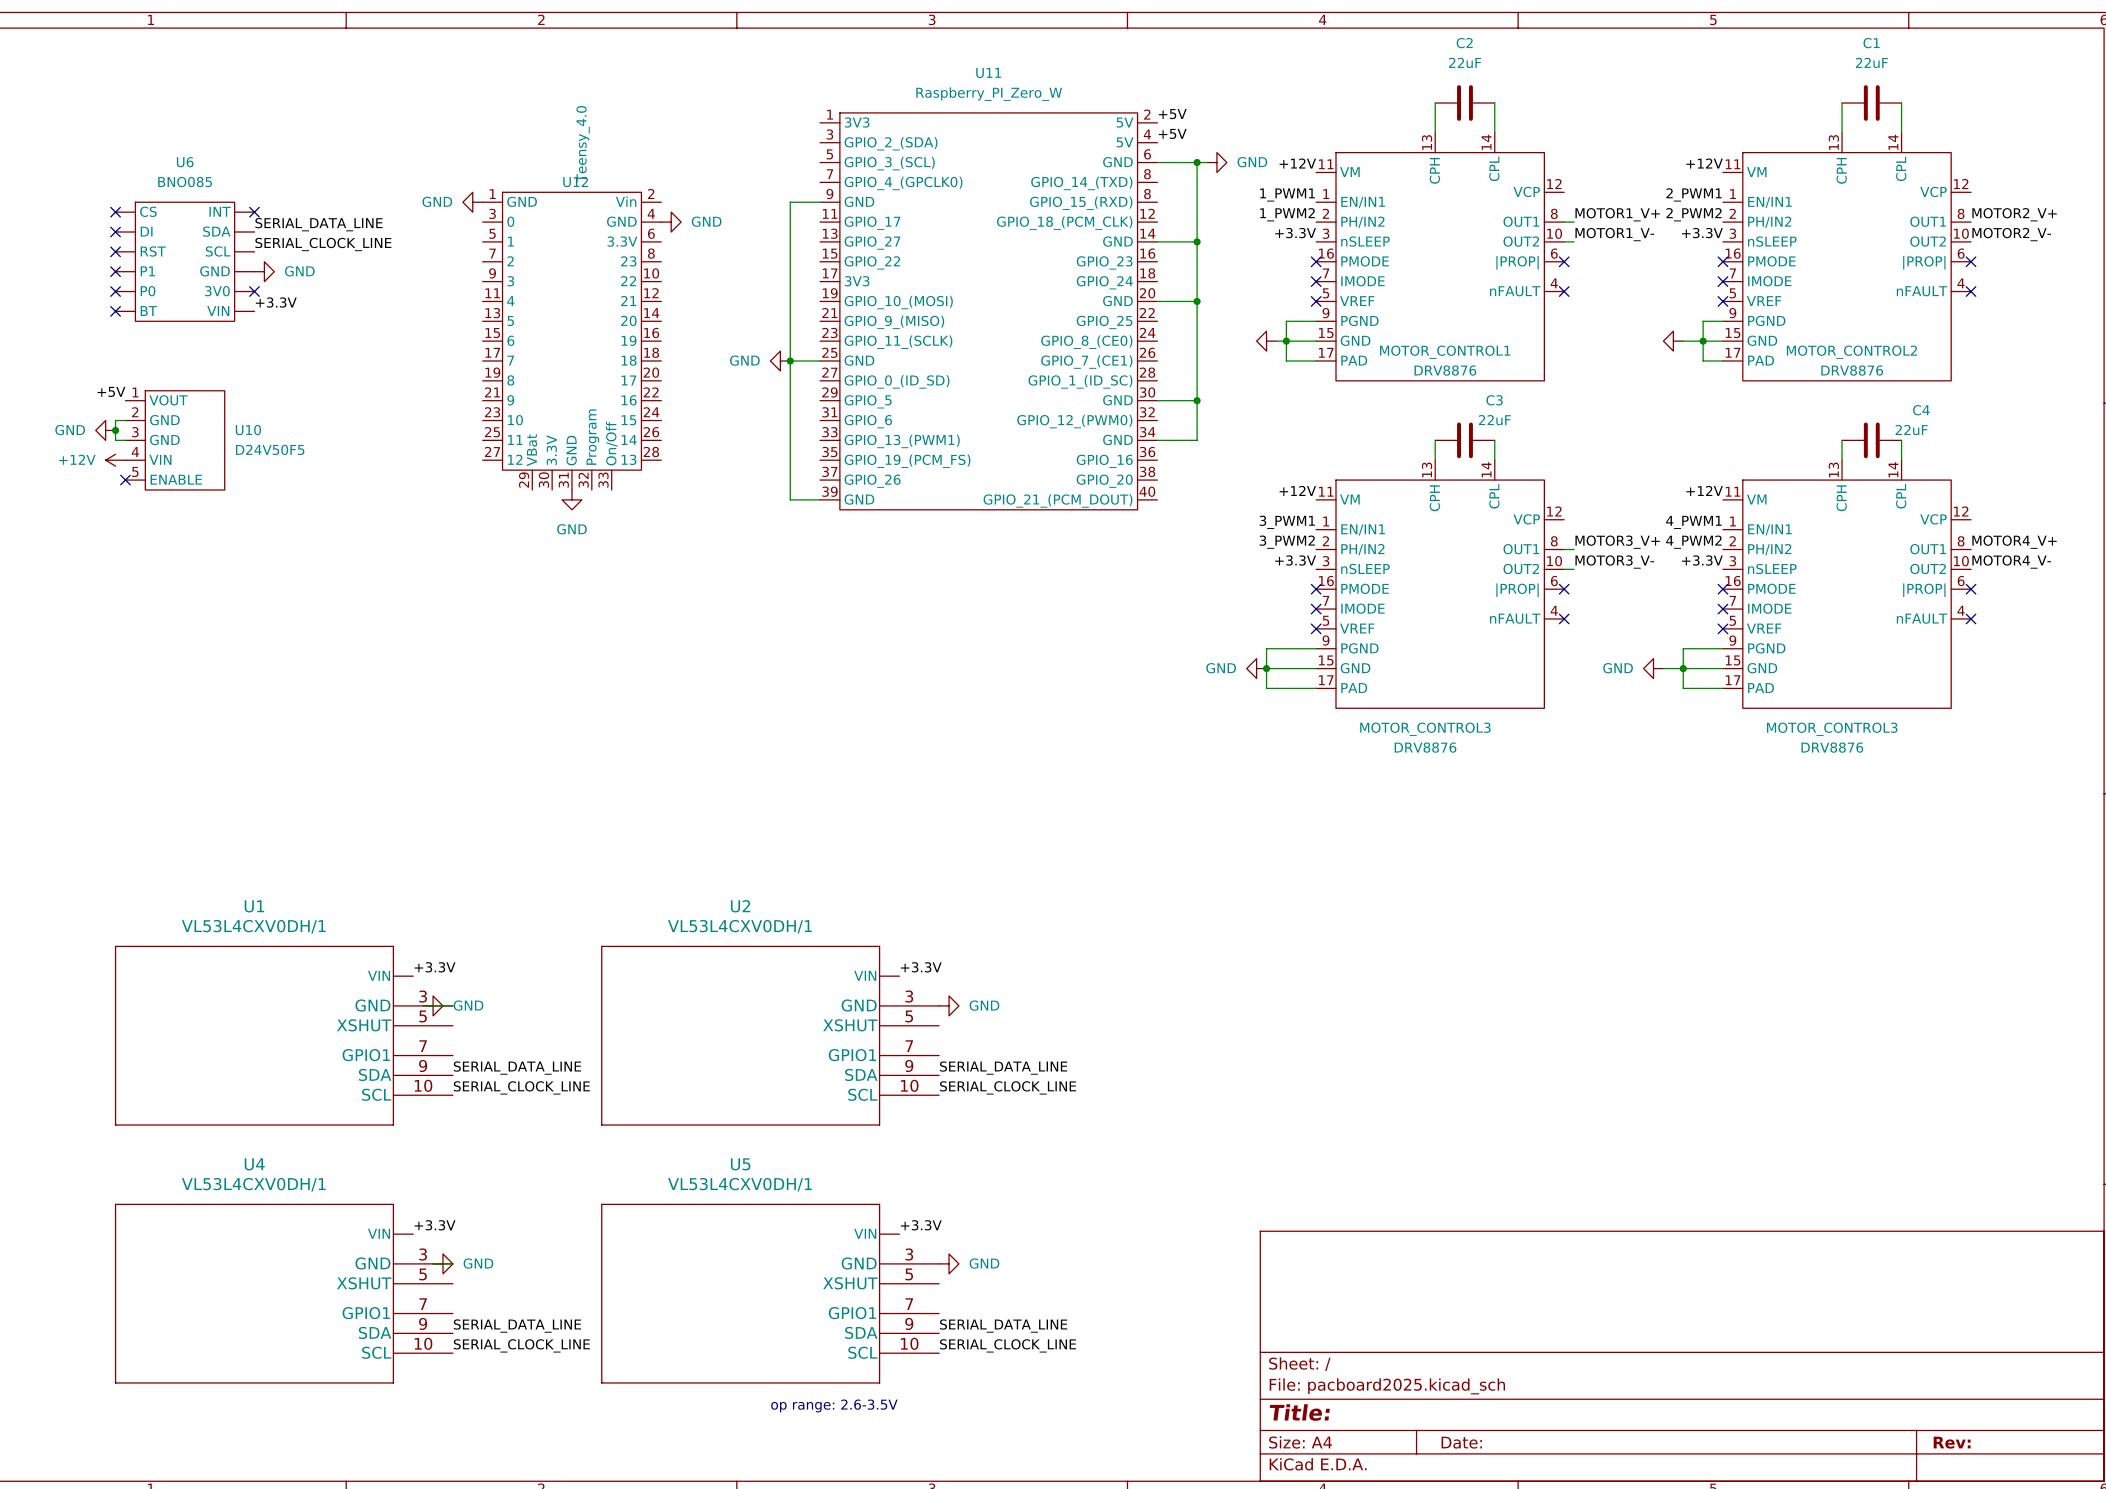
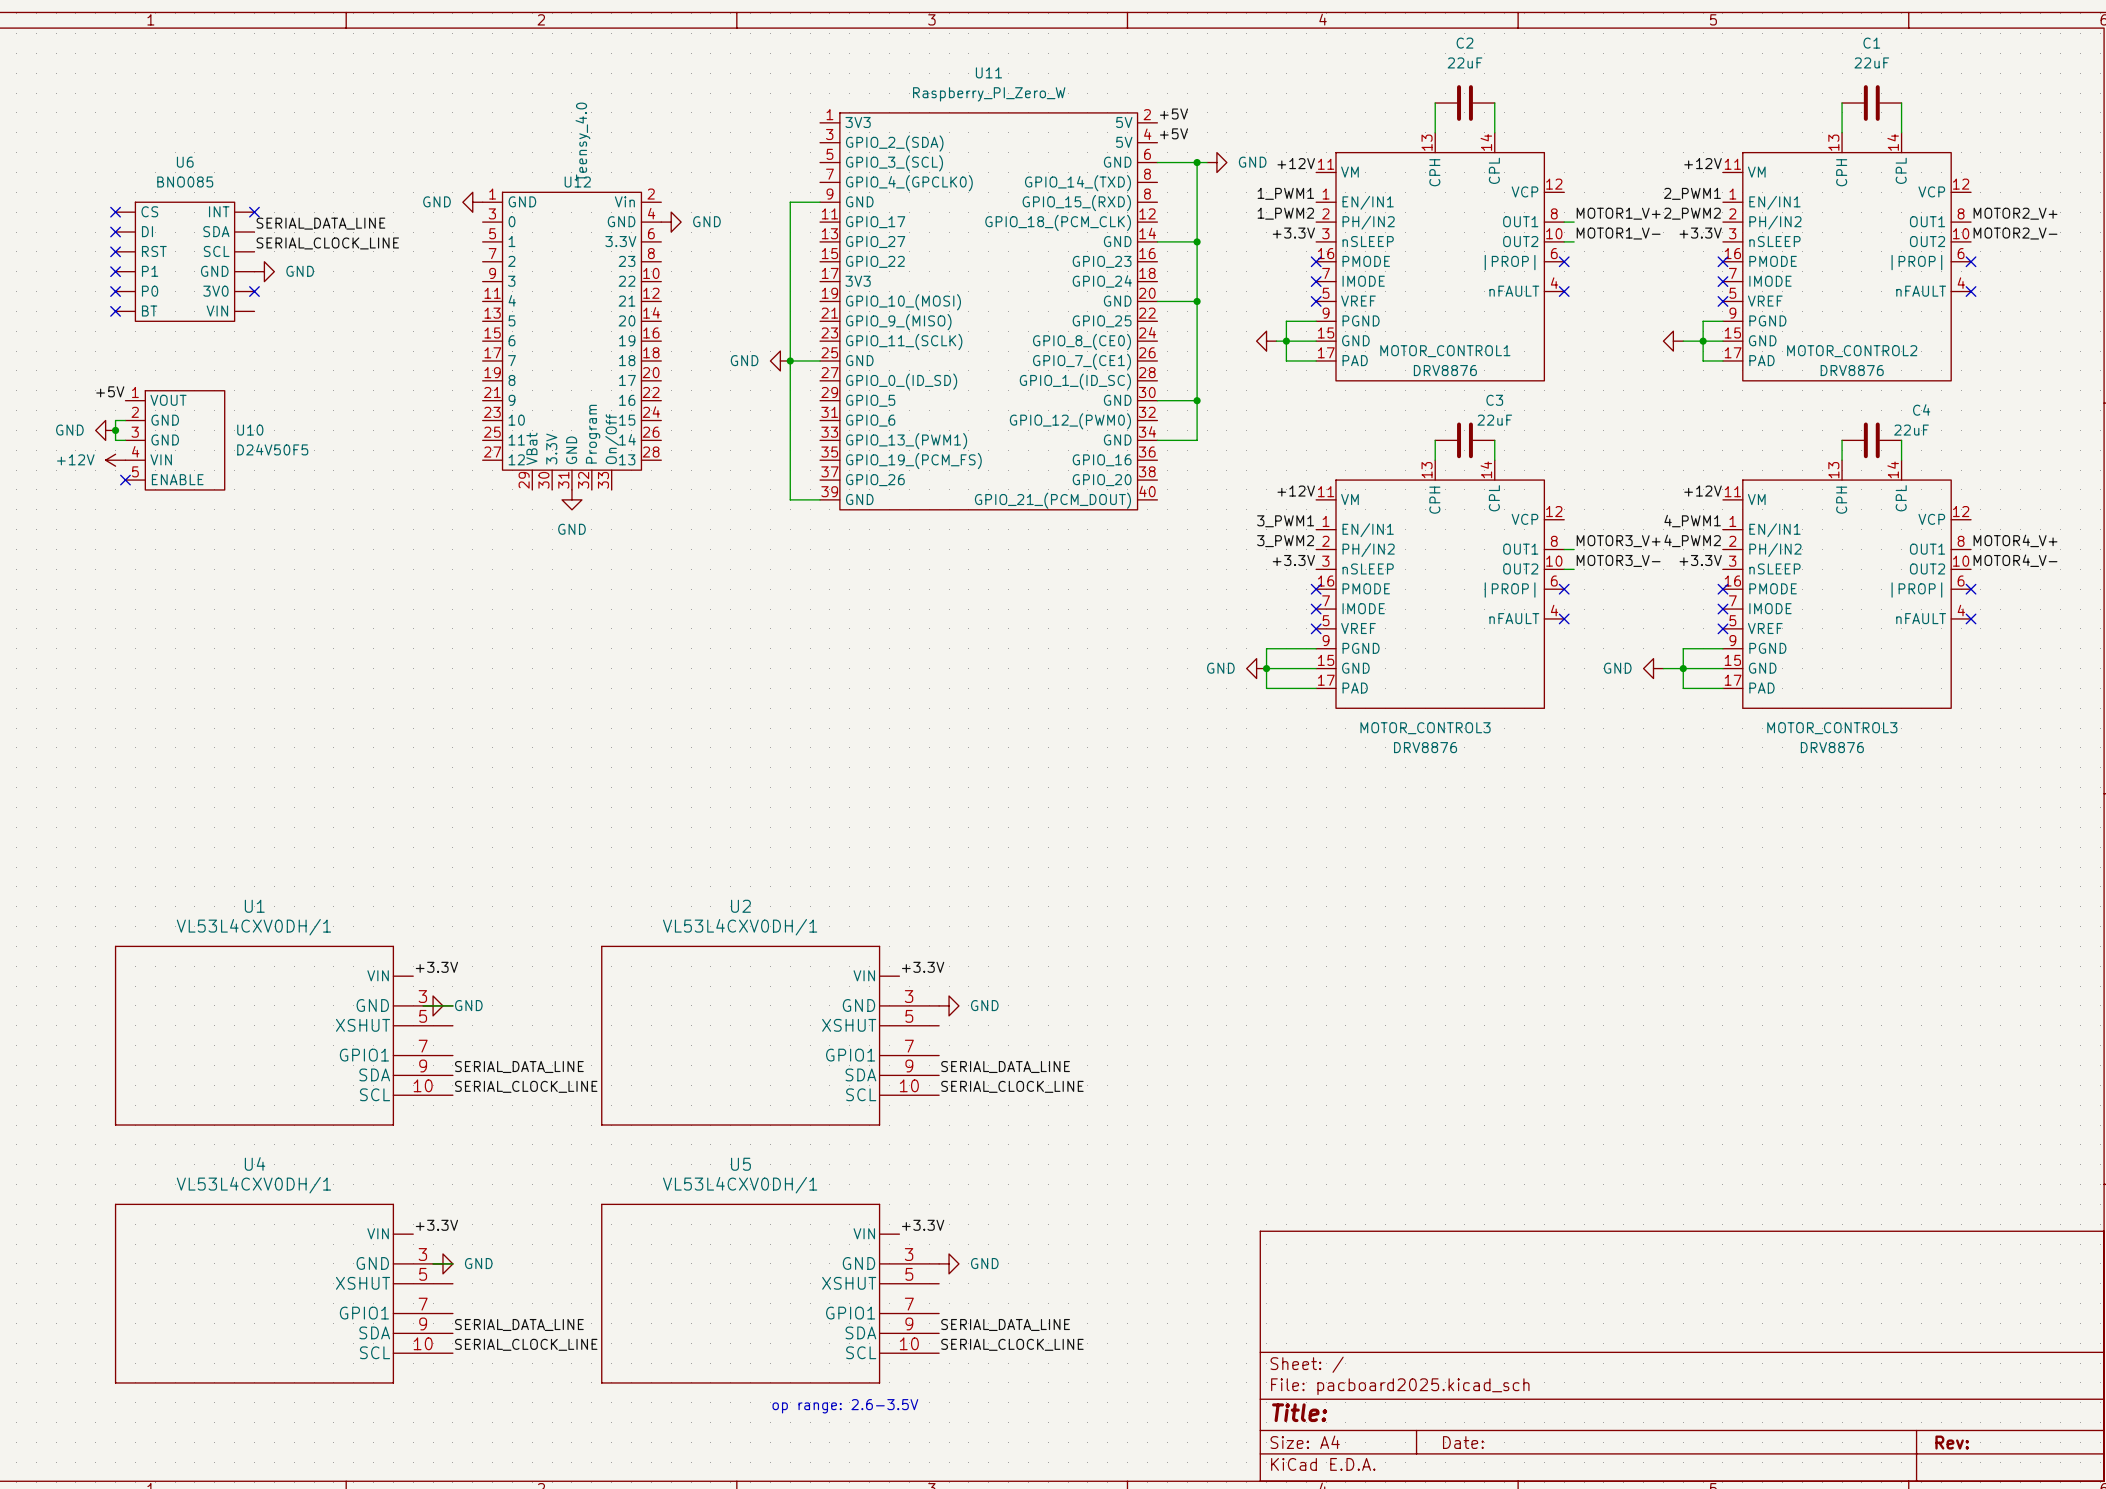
label: +3.3V (276, 302) -> none

